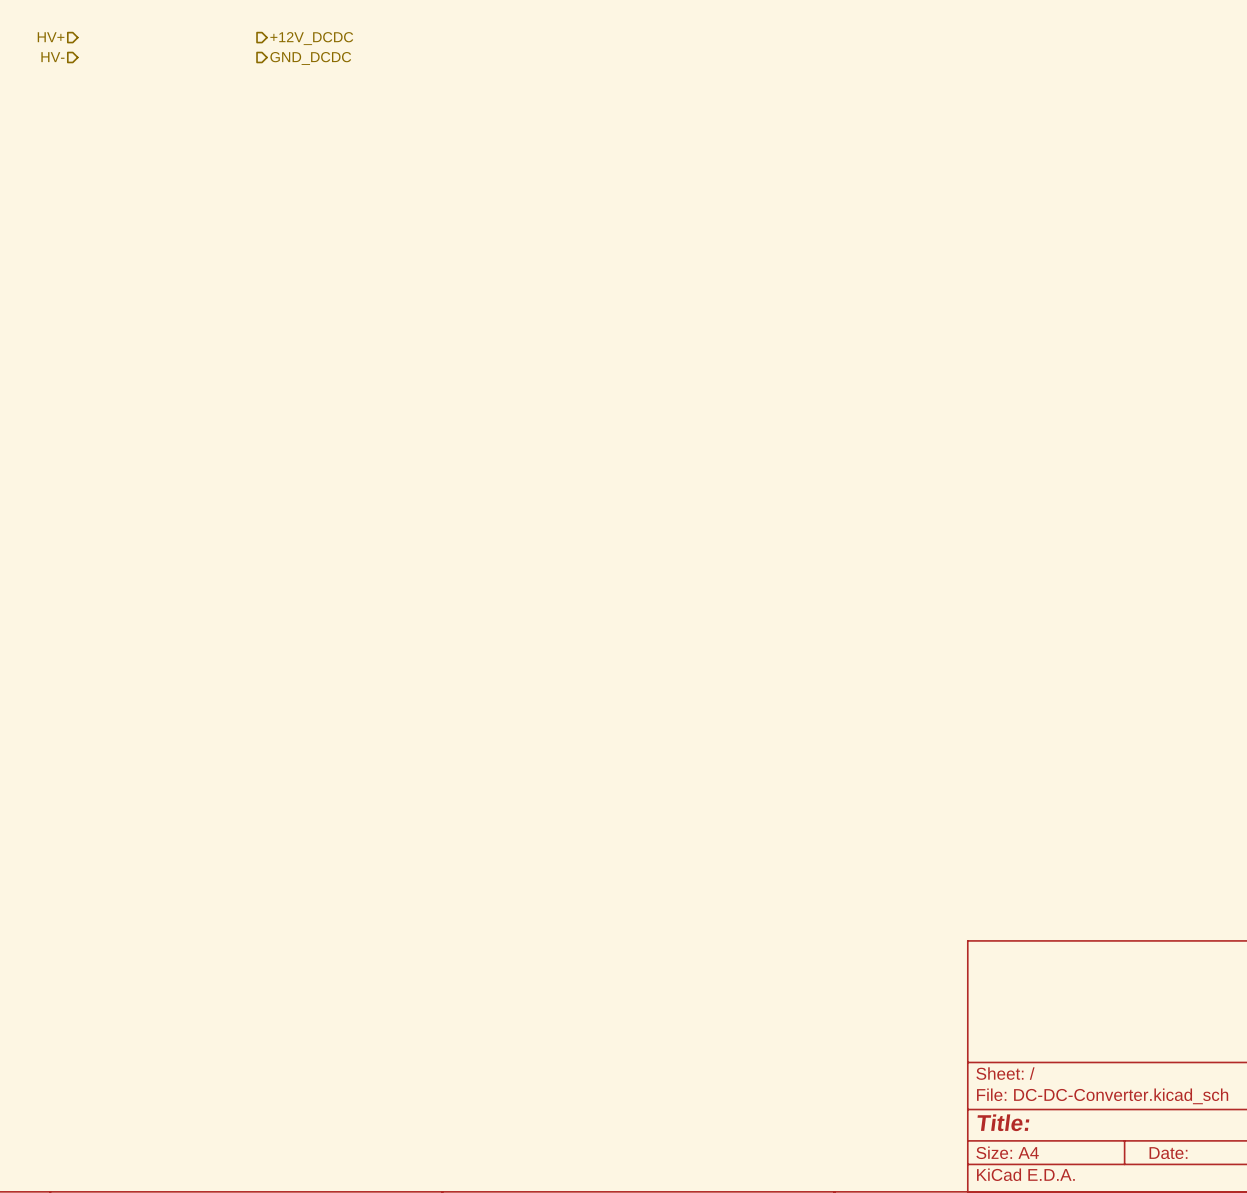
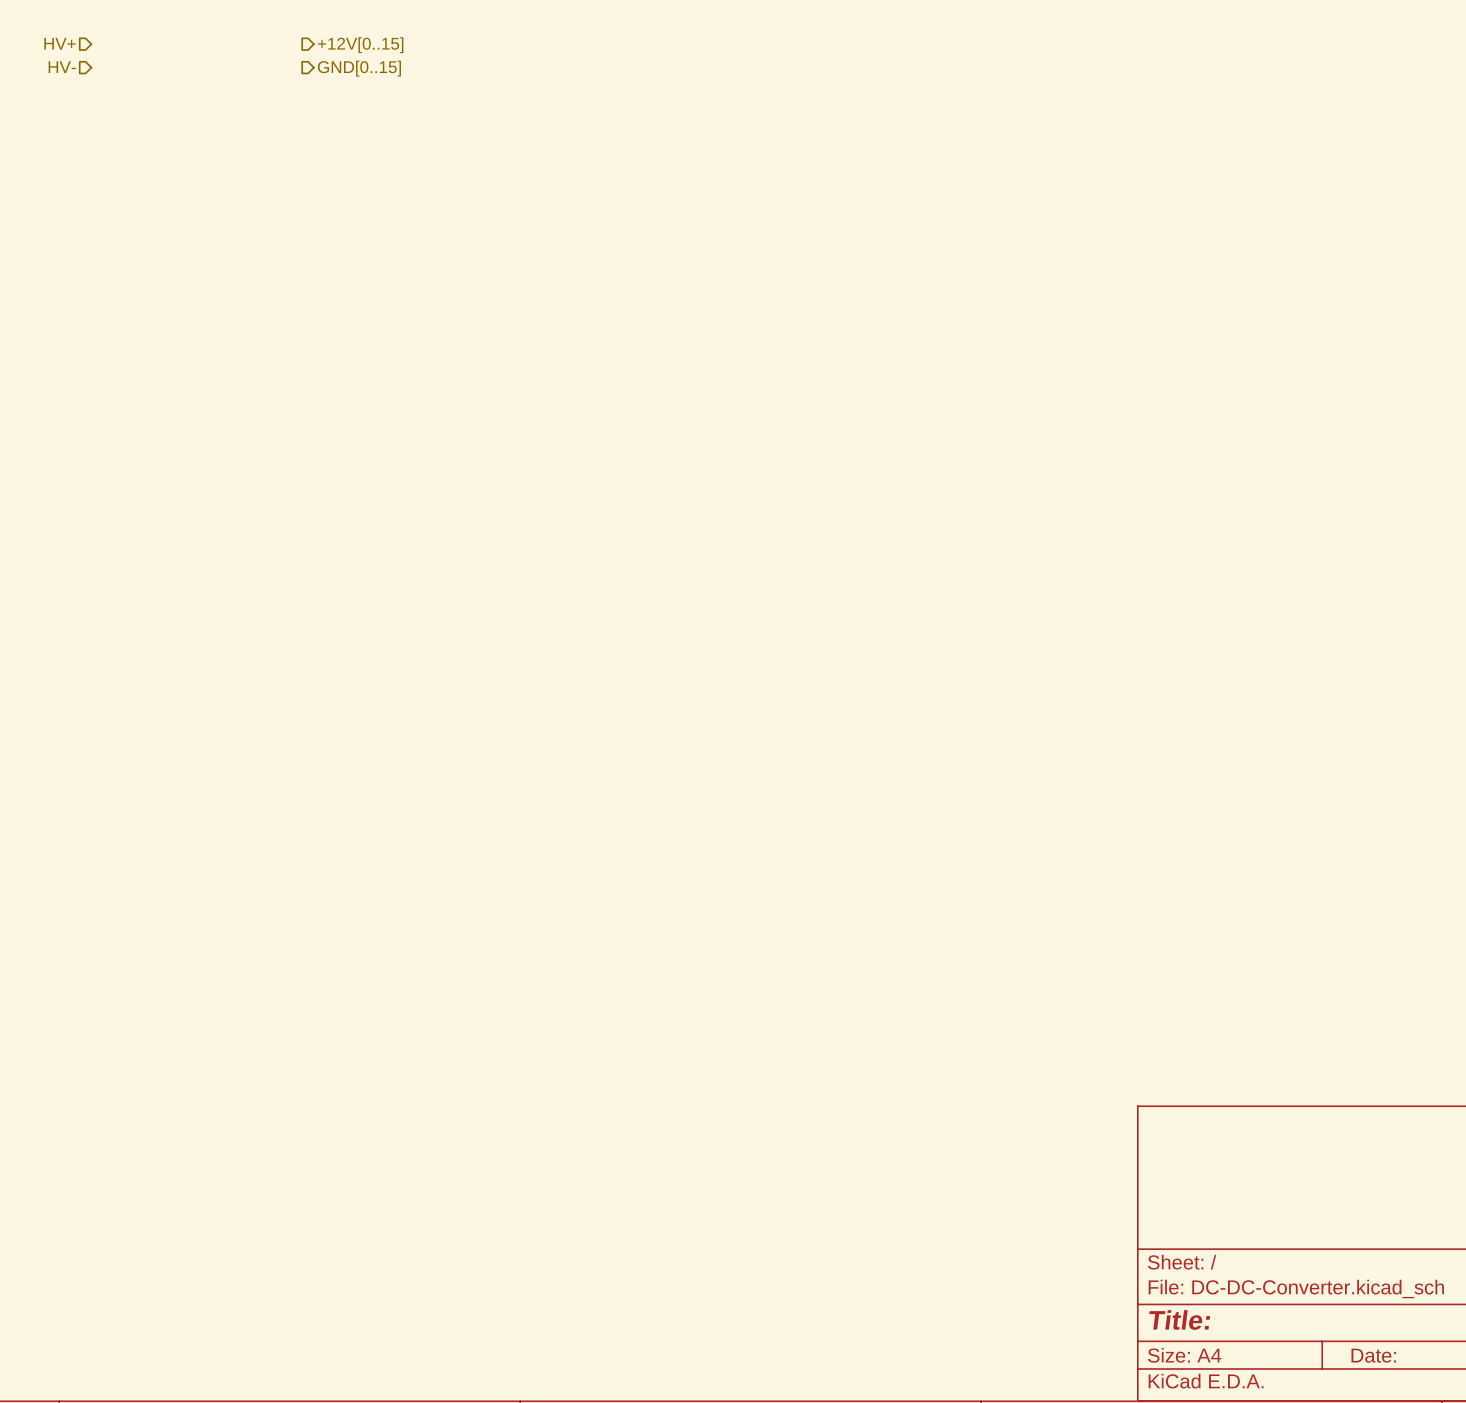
hierarchical label: +12V_DCDC (311, 38) -> +12V[0..15] (360, 45)
hierarchical label: GND_DCDC (310, 58) -> GND[0..15] (359, 68)

